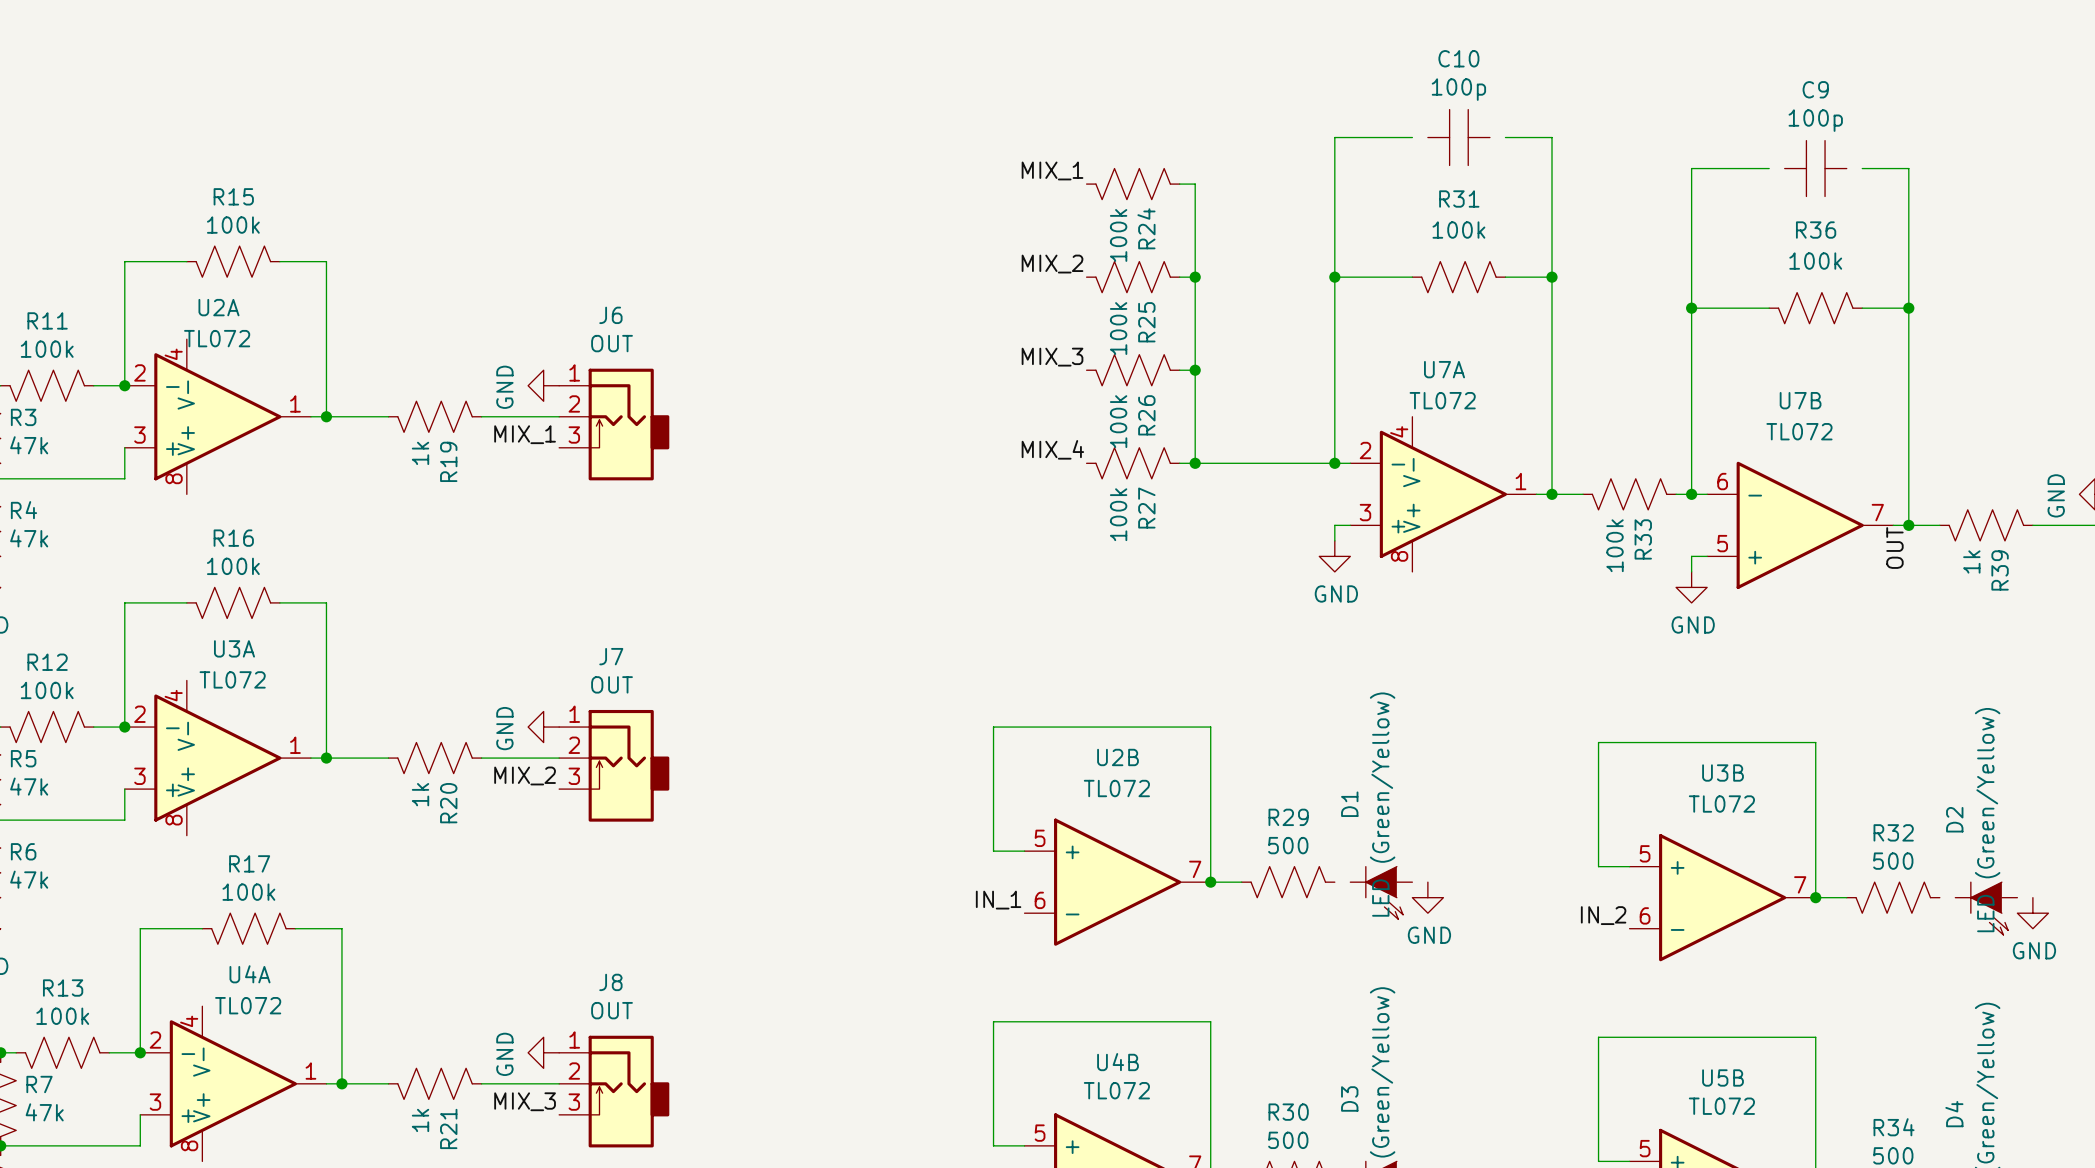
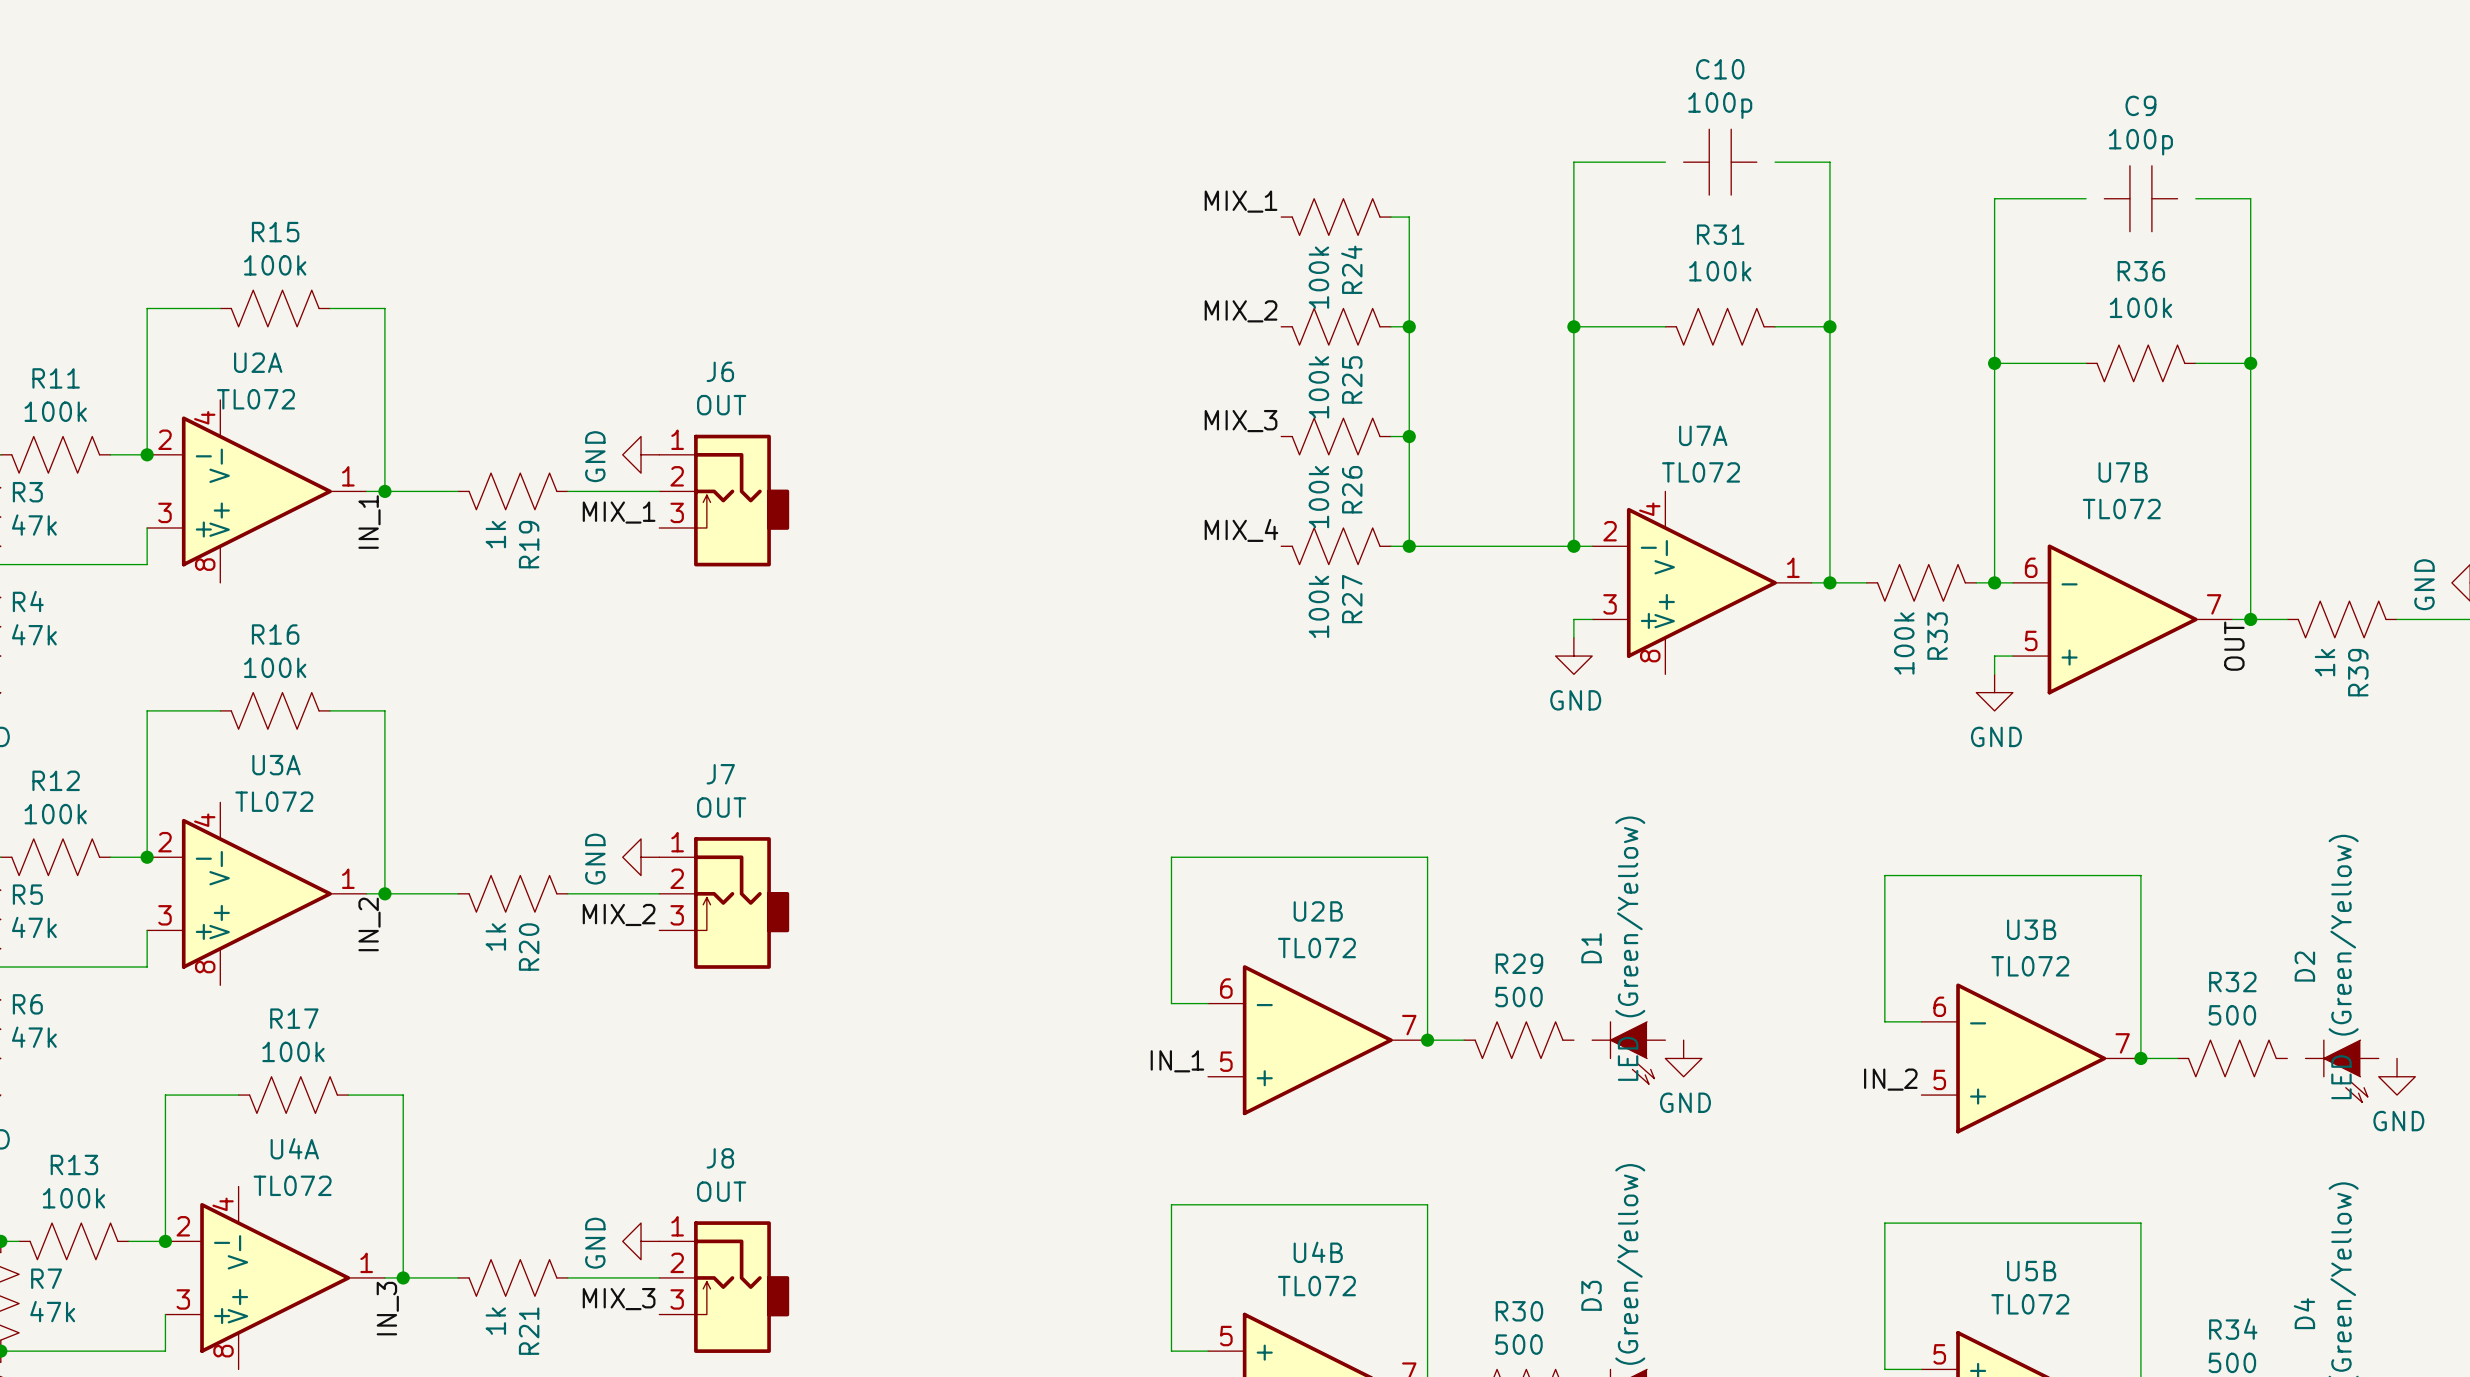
label: none -> IN_1 (369, 522)
label: none -> IN_2 (369, 924)
U2B flip: as is (1117, 882) -> up-down (1317, 1040)
U3B flip: as is (1722, 897) -> up-down (2031, 1058)
label: none -> IN_3 (387, 1308)

